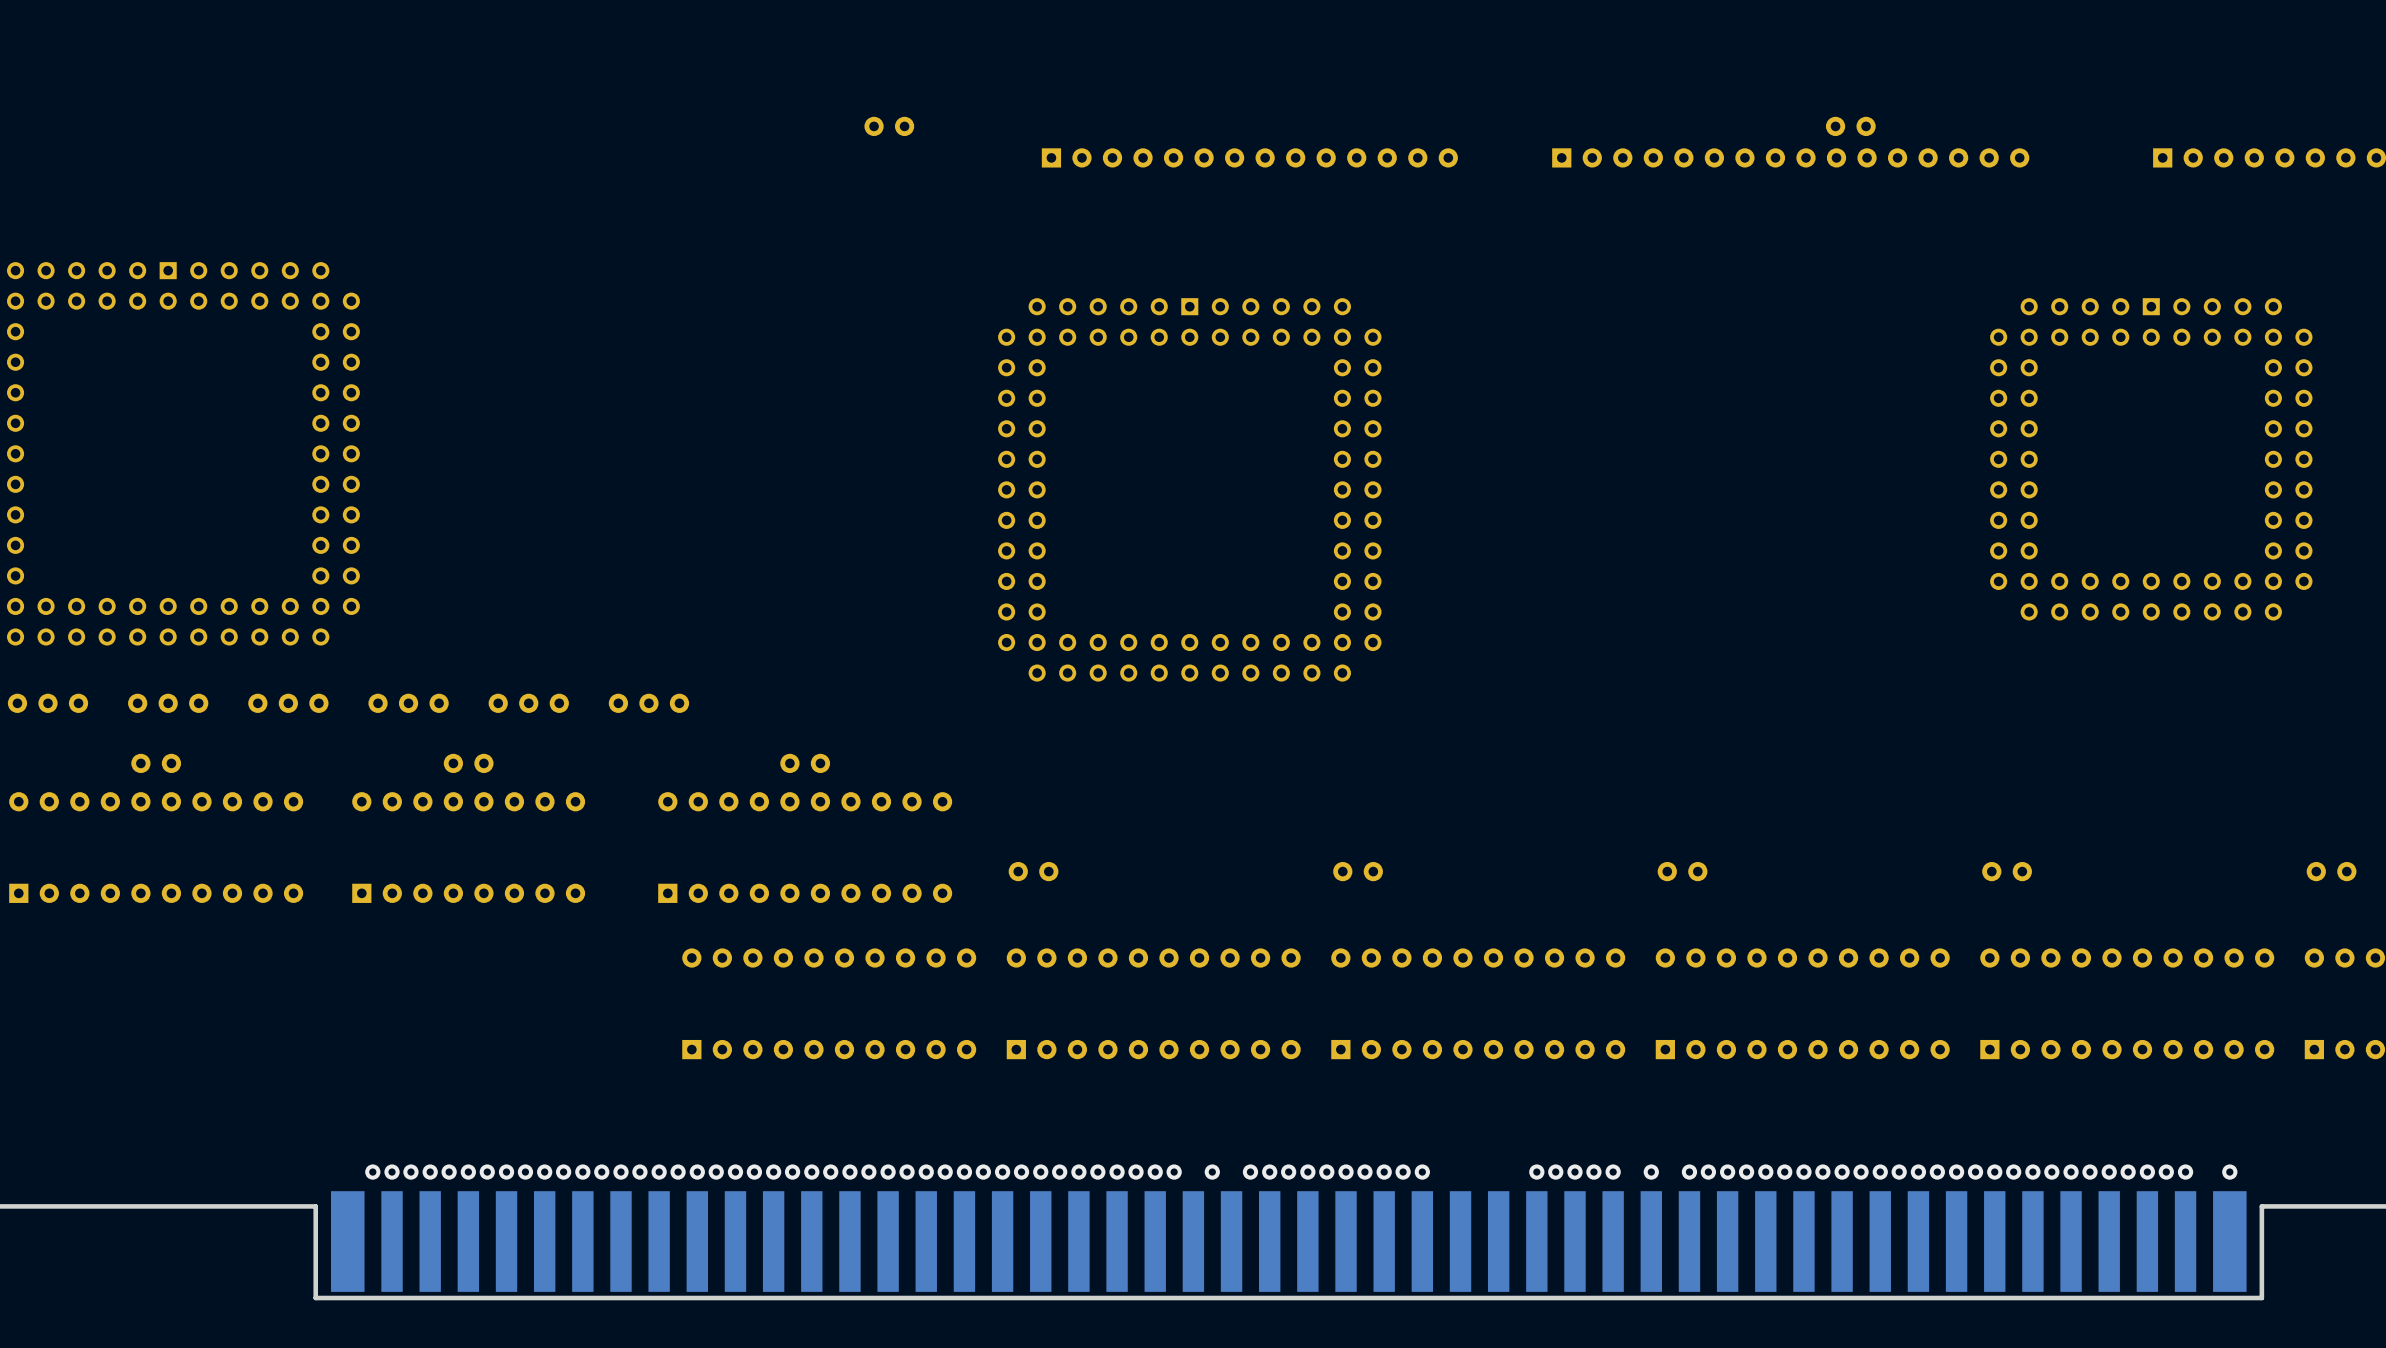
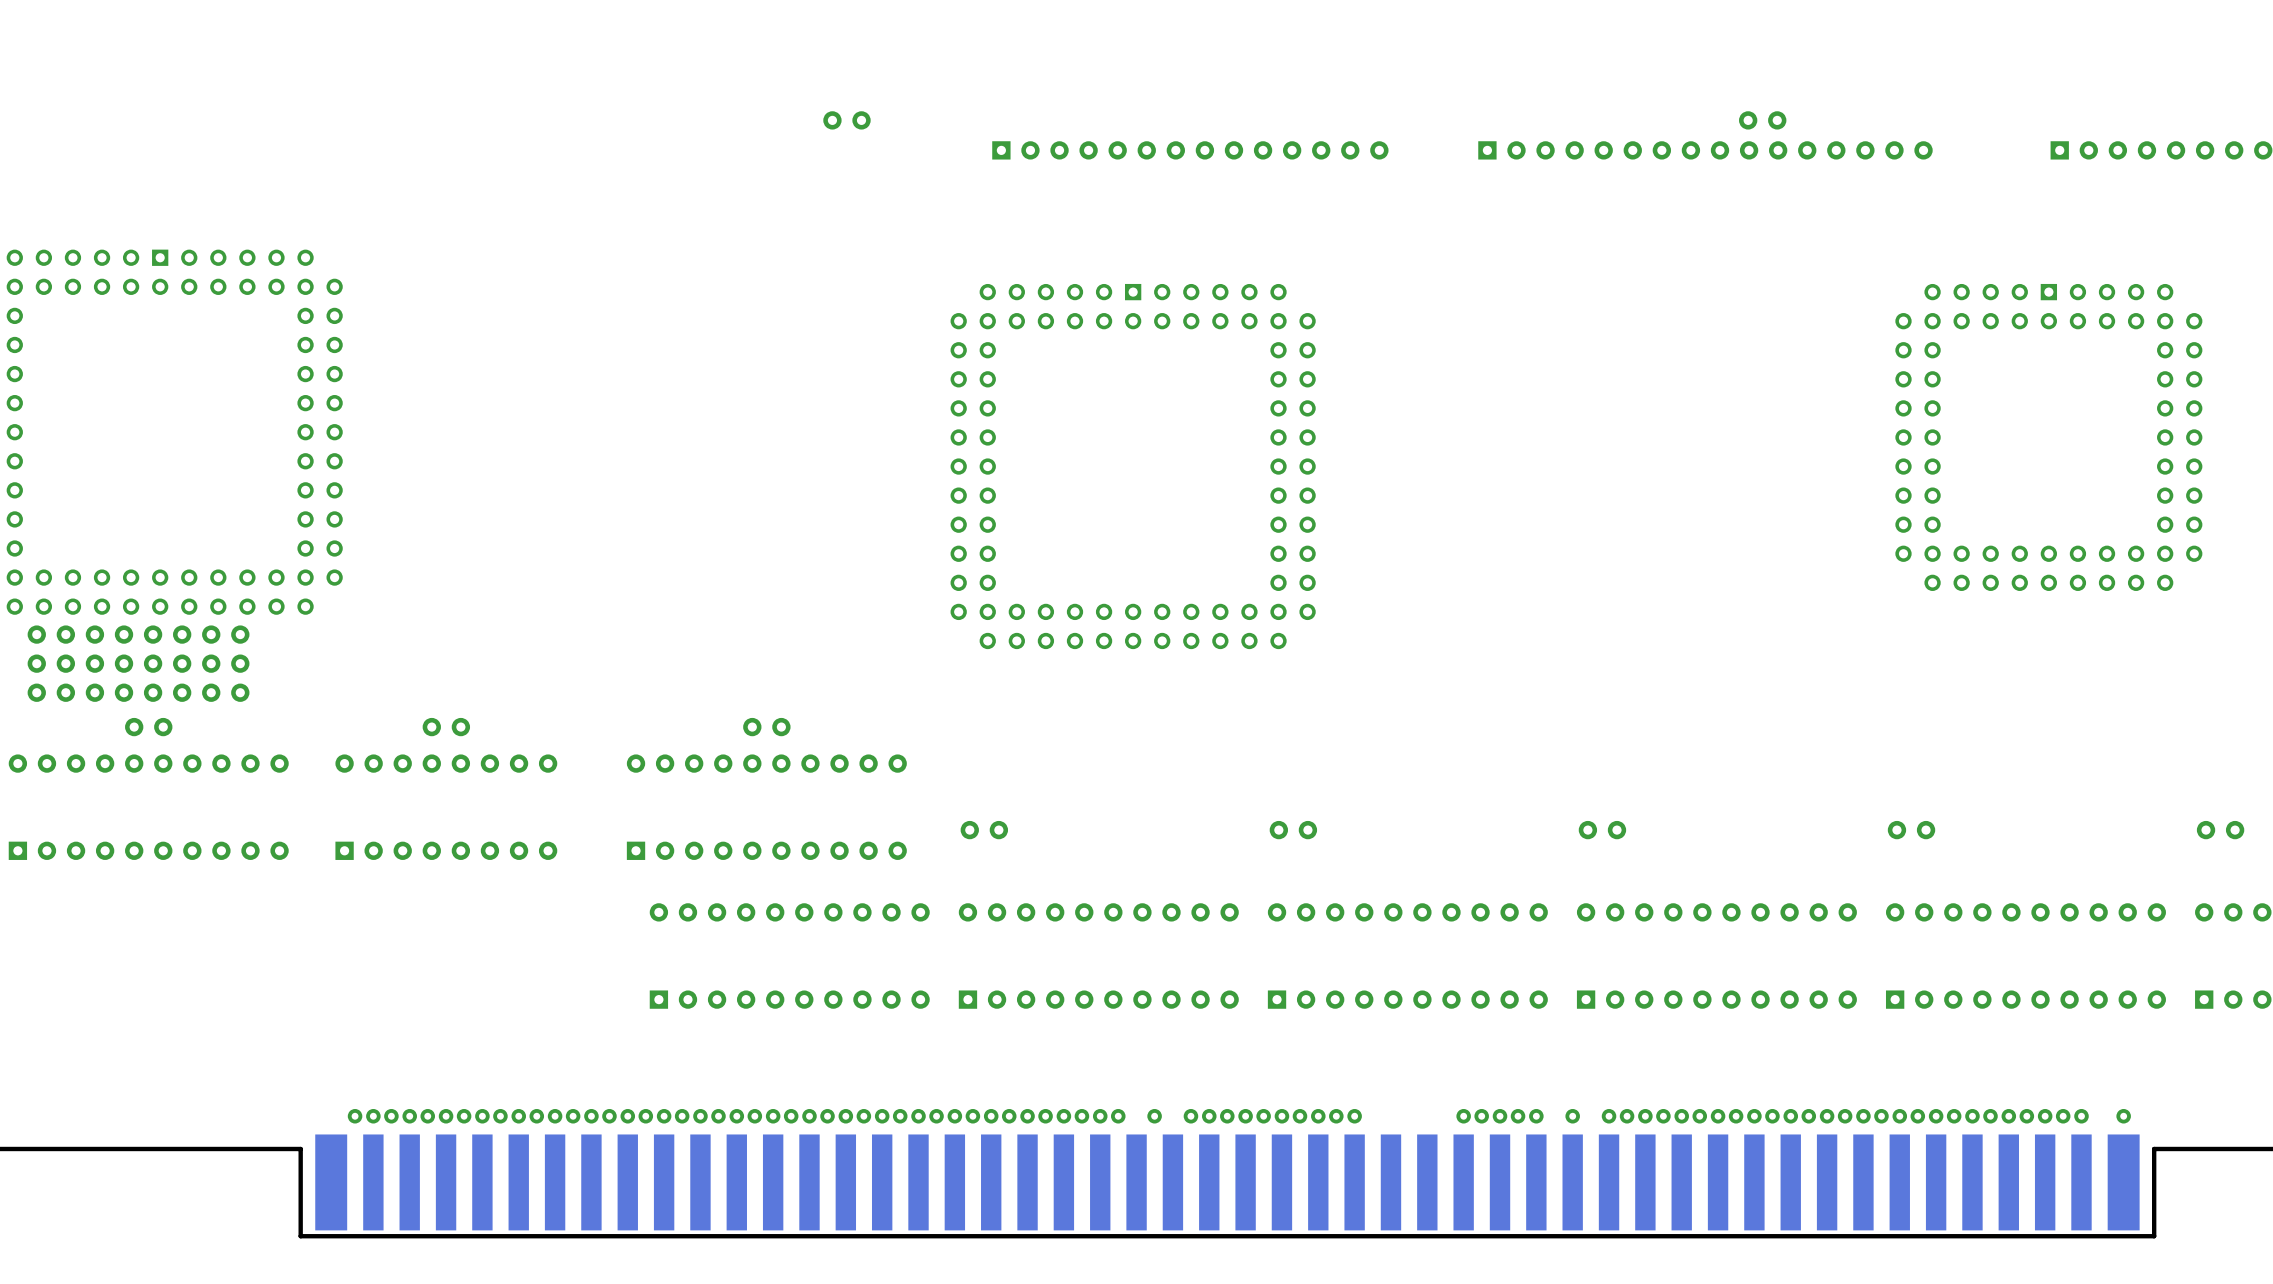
part: none -> (138, 663)
part: (48, 703) -> none
part: (168, 703) -> none
part: (288, 703) -> none
part: (408, 703) -> none
part: (528, 703) -> none
part: (648, 703) -> none

